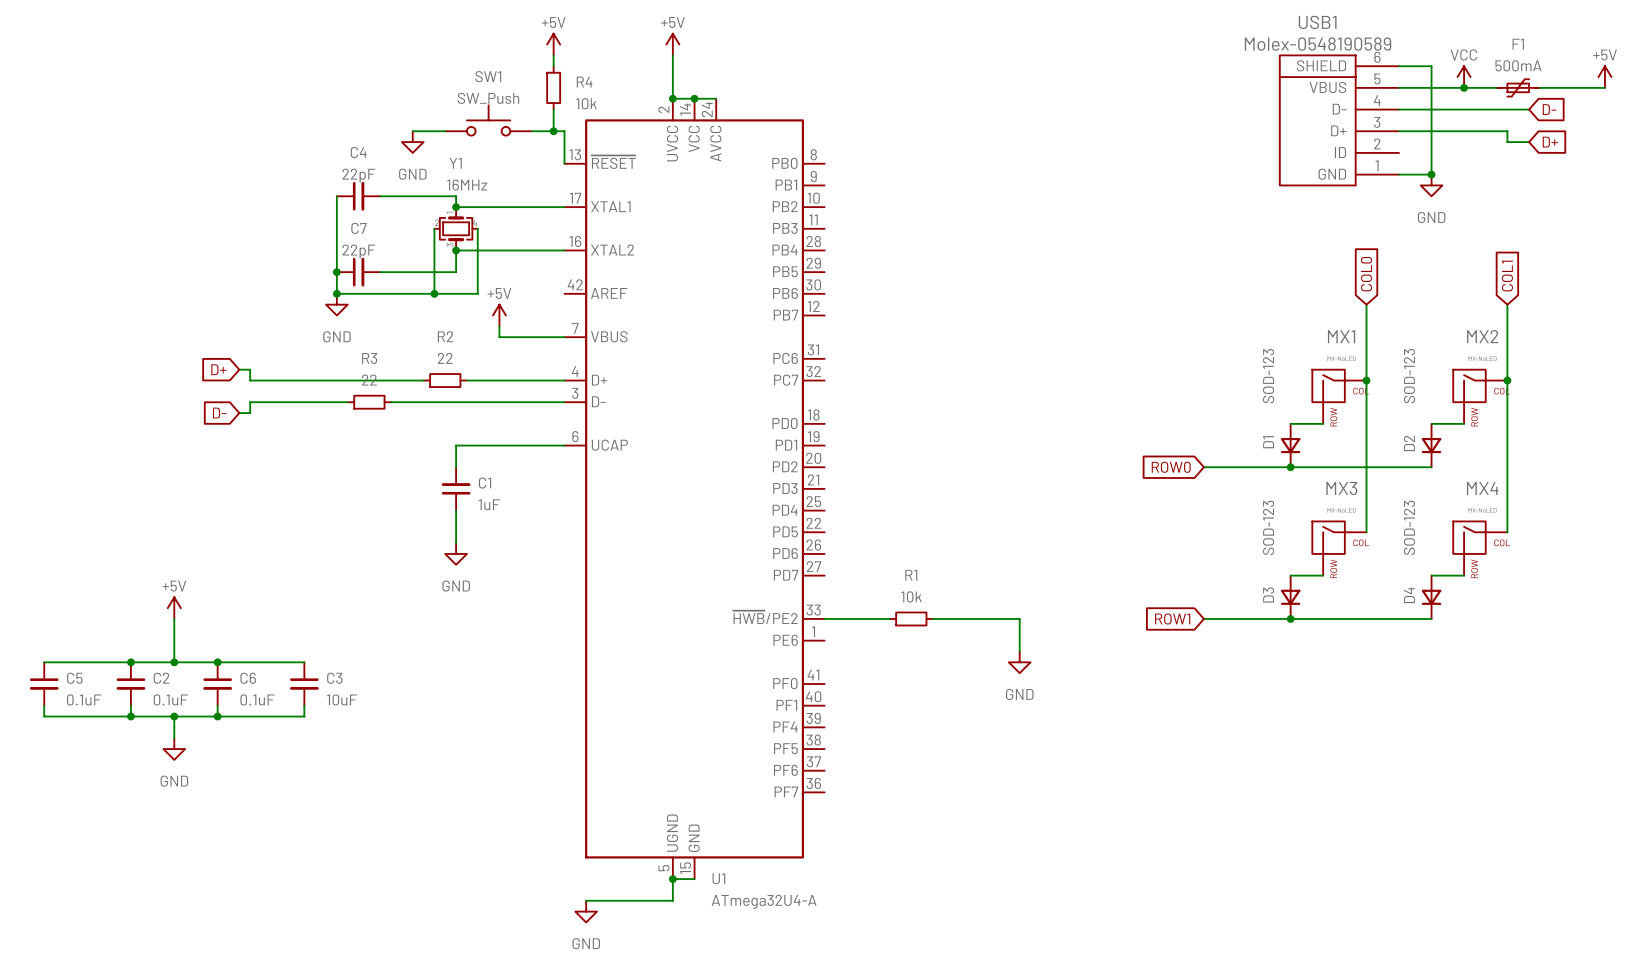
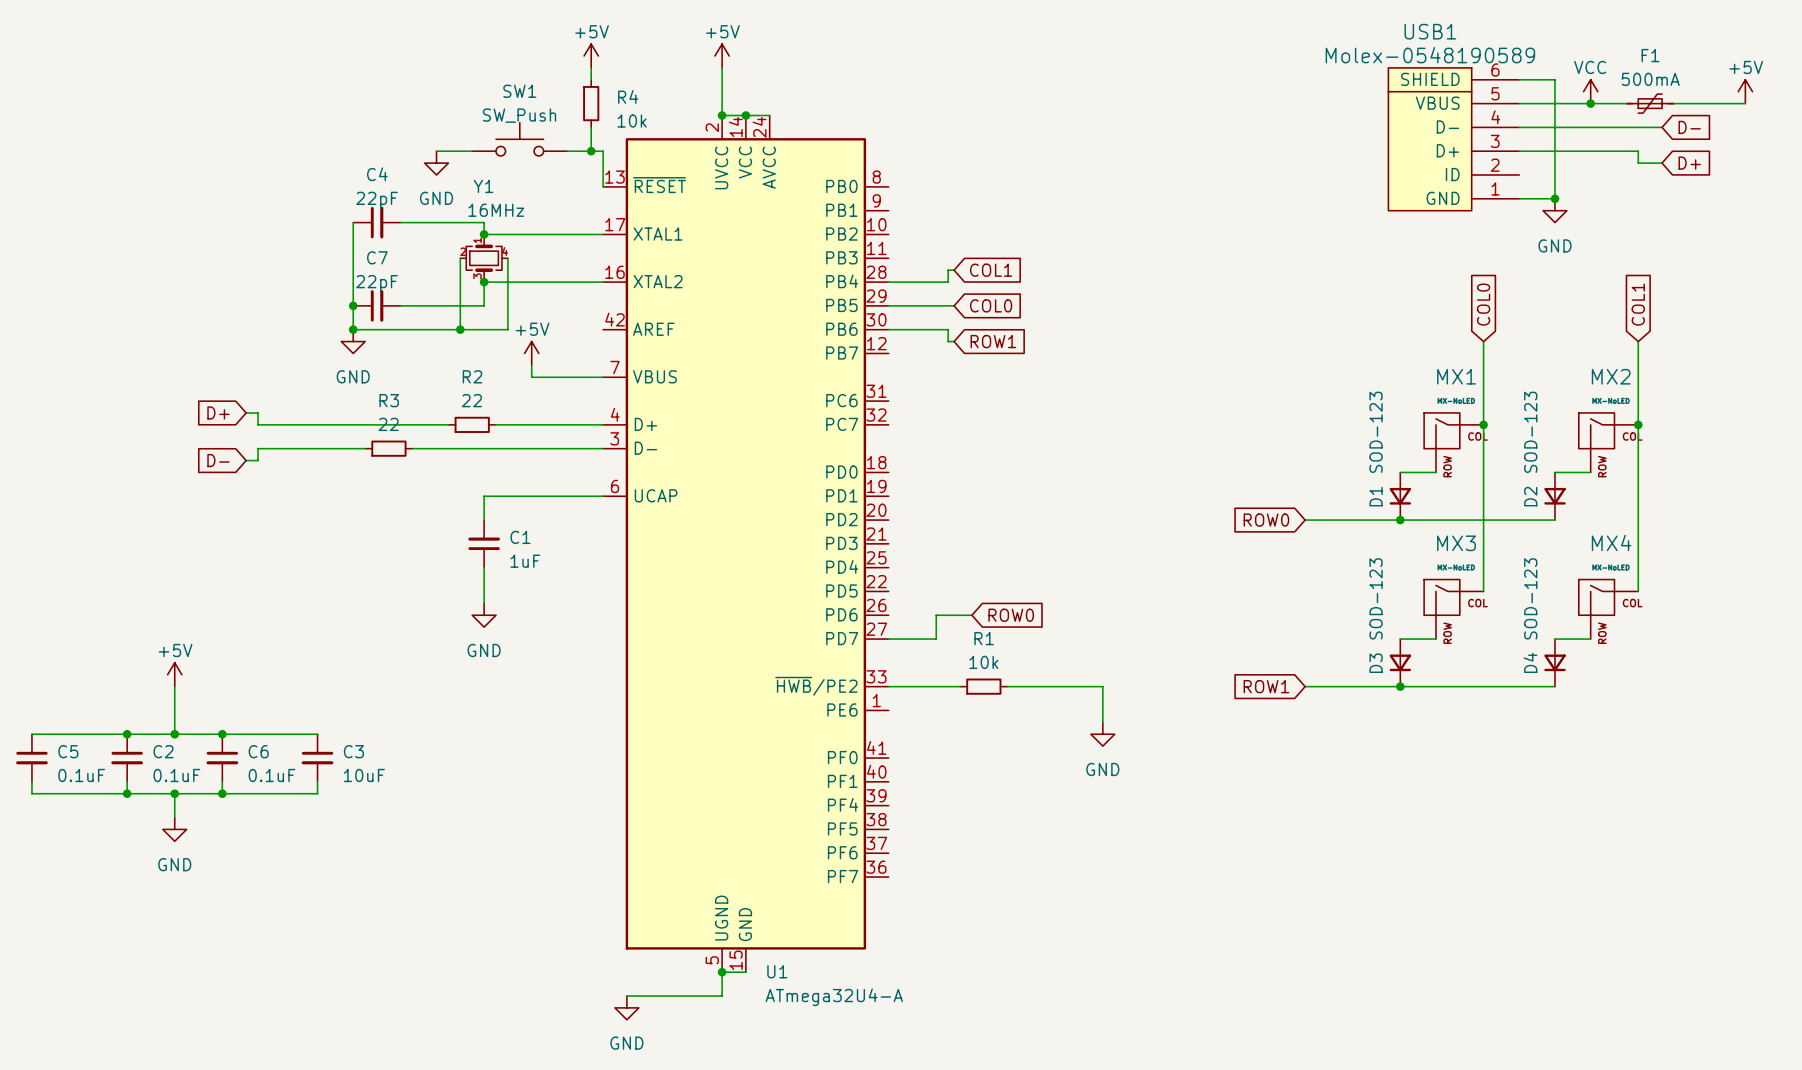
wire: none -> (954, 270) (948, 270) (948, 282) (888, 282)
global label: none -> COL1 (991, 270)
wire: none -> (888, 305) (954, 305)
global label: none -> COL0 (991, 305)
wire: none -> (888, 329) (948, 329) (948, 341) (954, 341)
global label: none -> ROW1 (993, 341)
wire: none -> (971, 615) (936, 615) (936, 639) (888, 639)
global label: none -> ROW0 (1011, 615)

